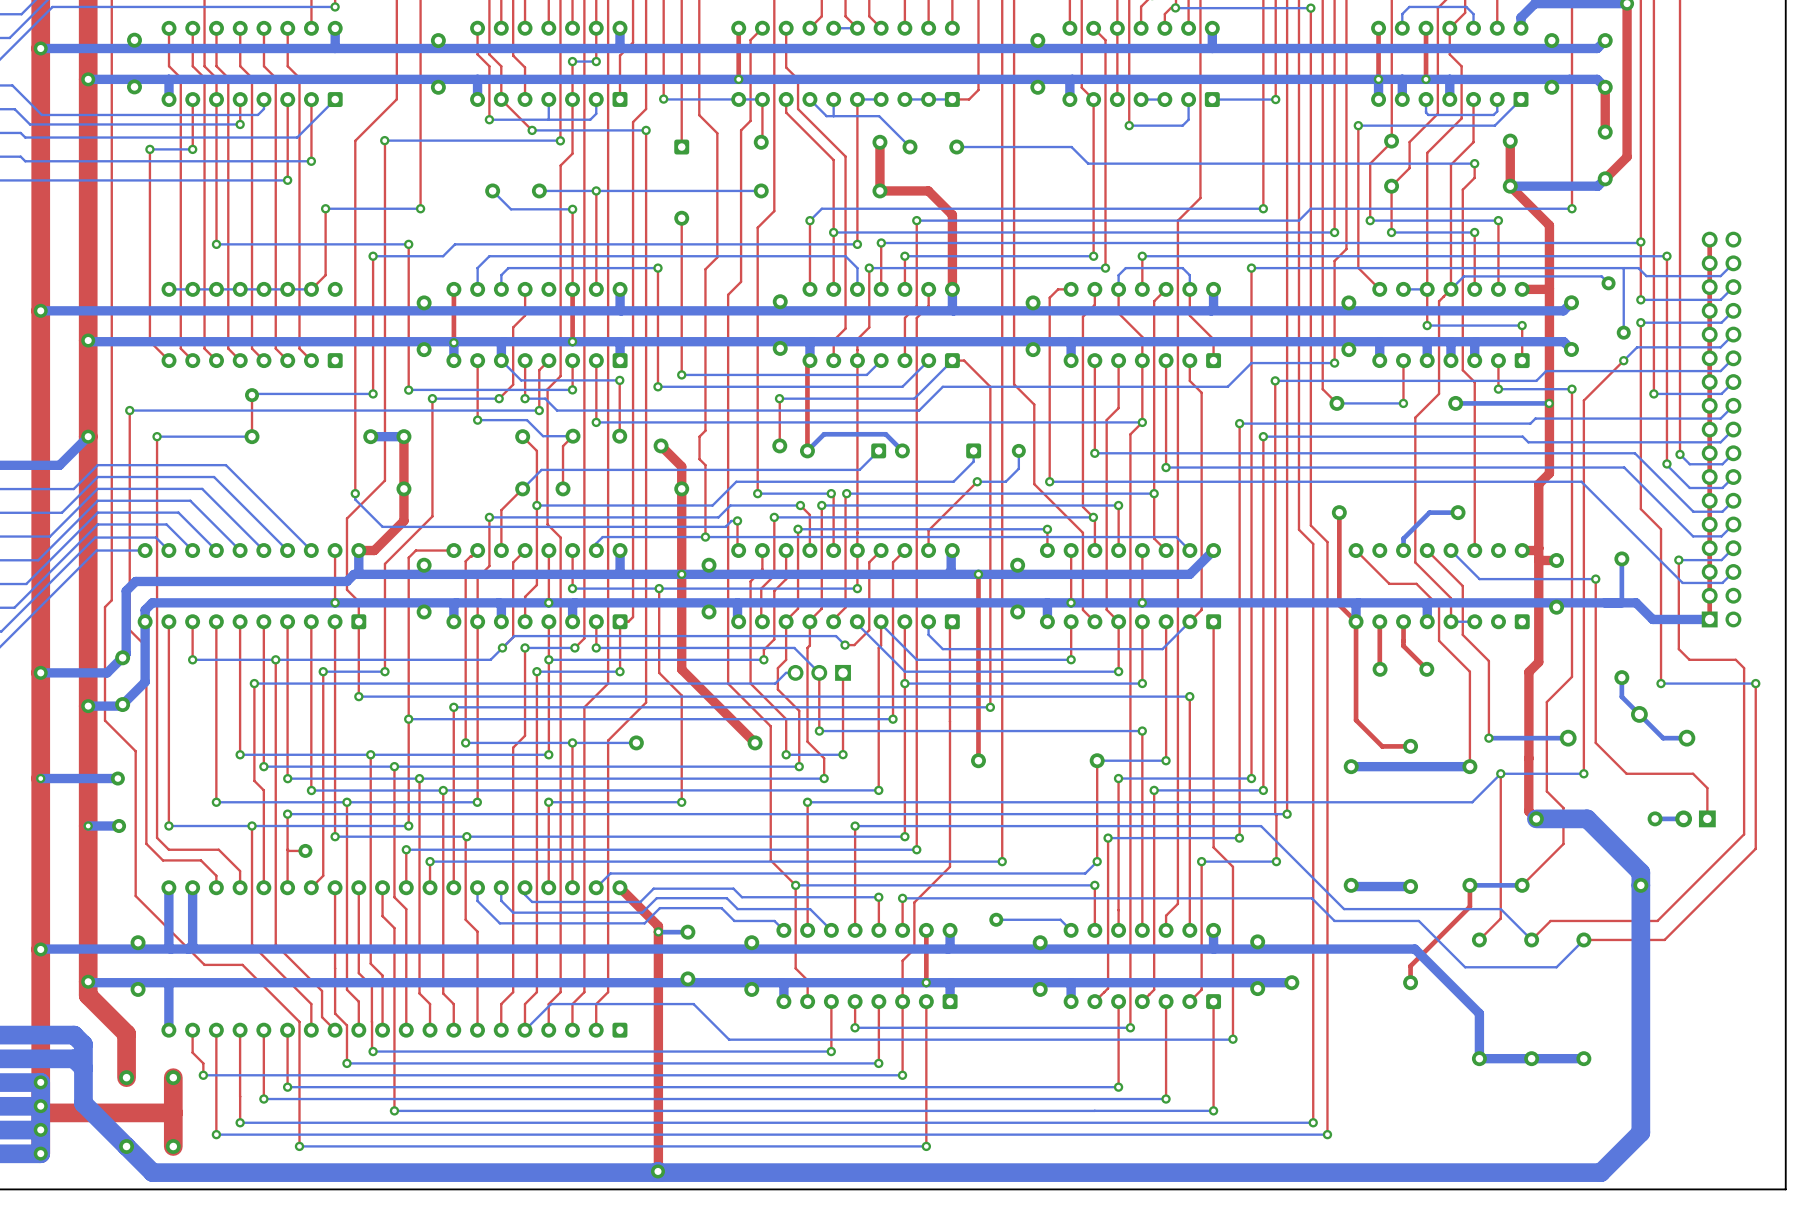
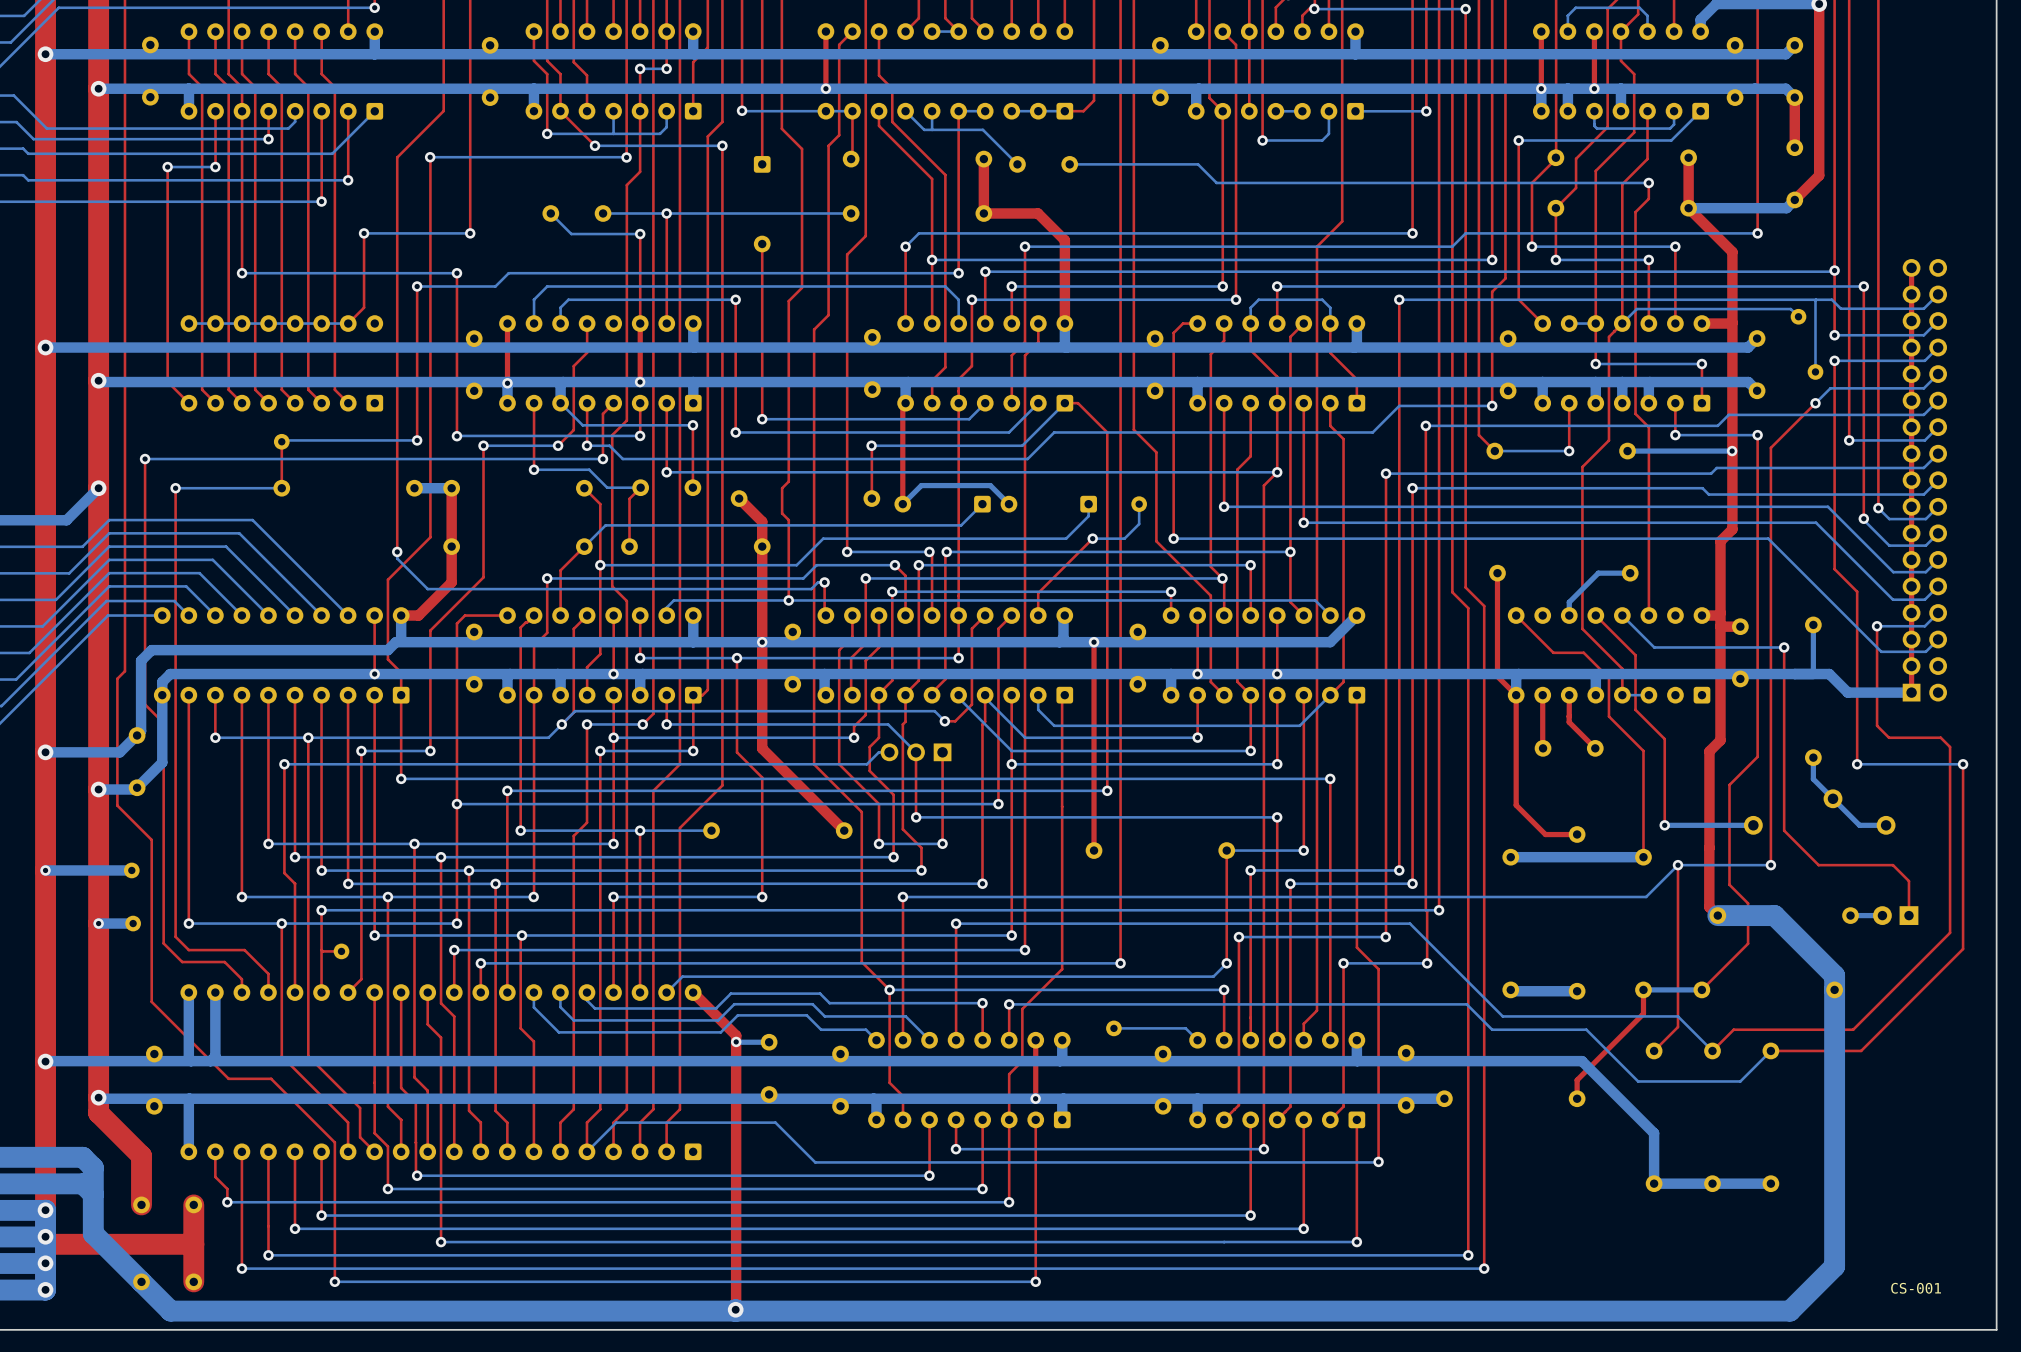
text: none -> CS-001 (1916, 1288)

